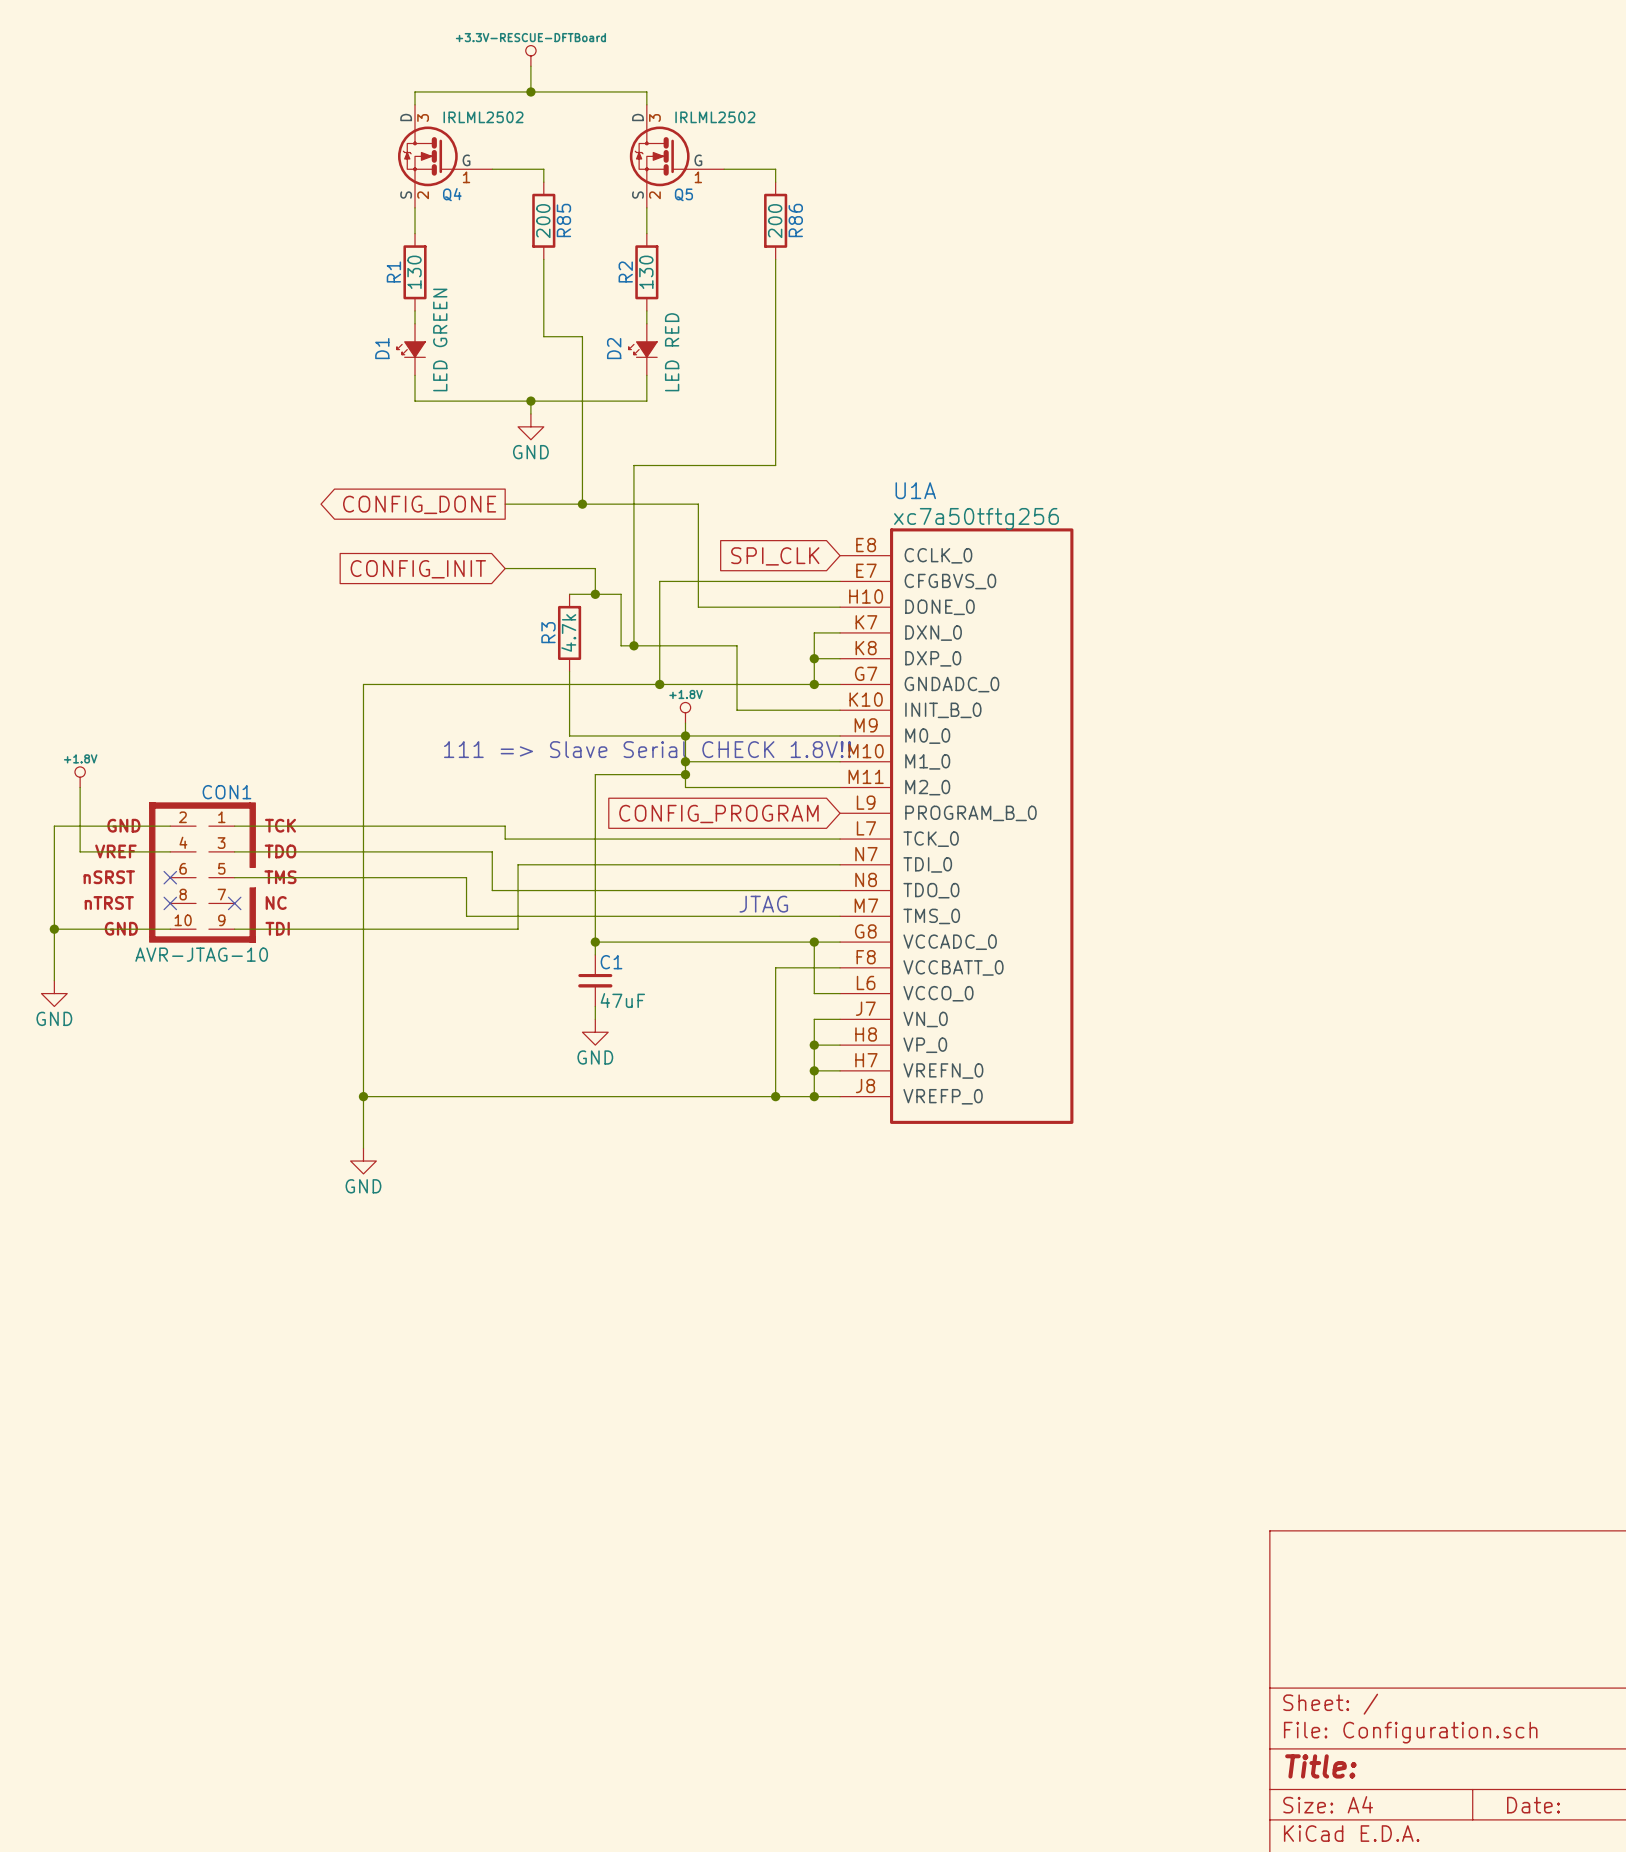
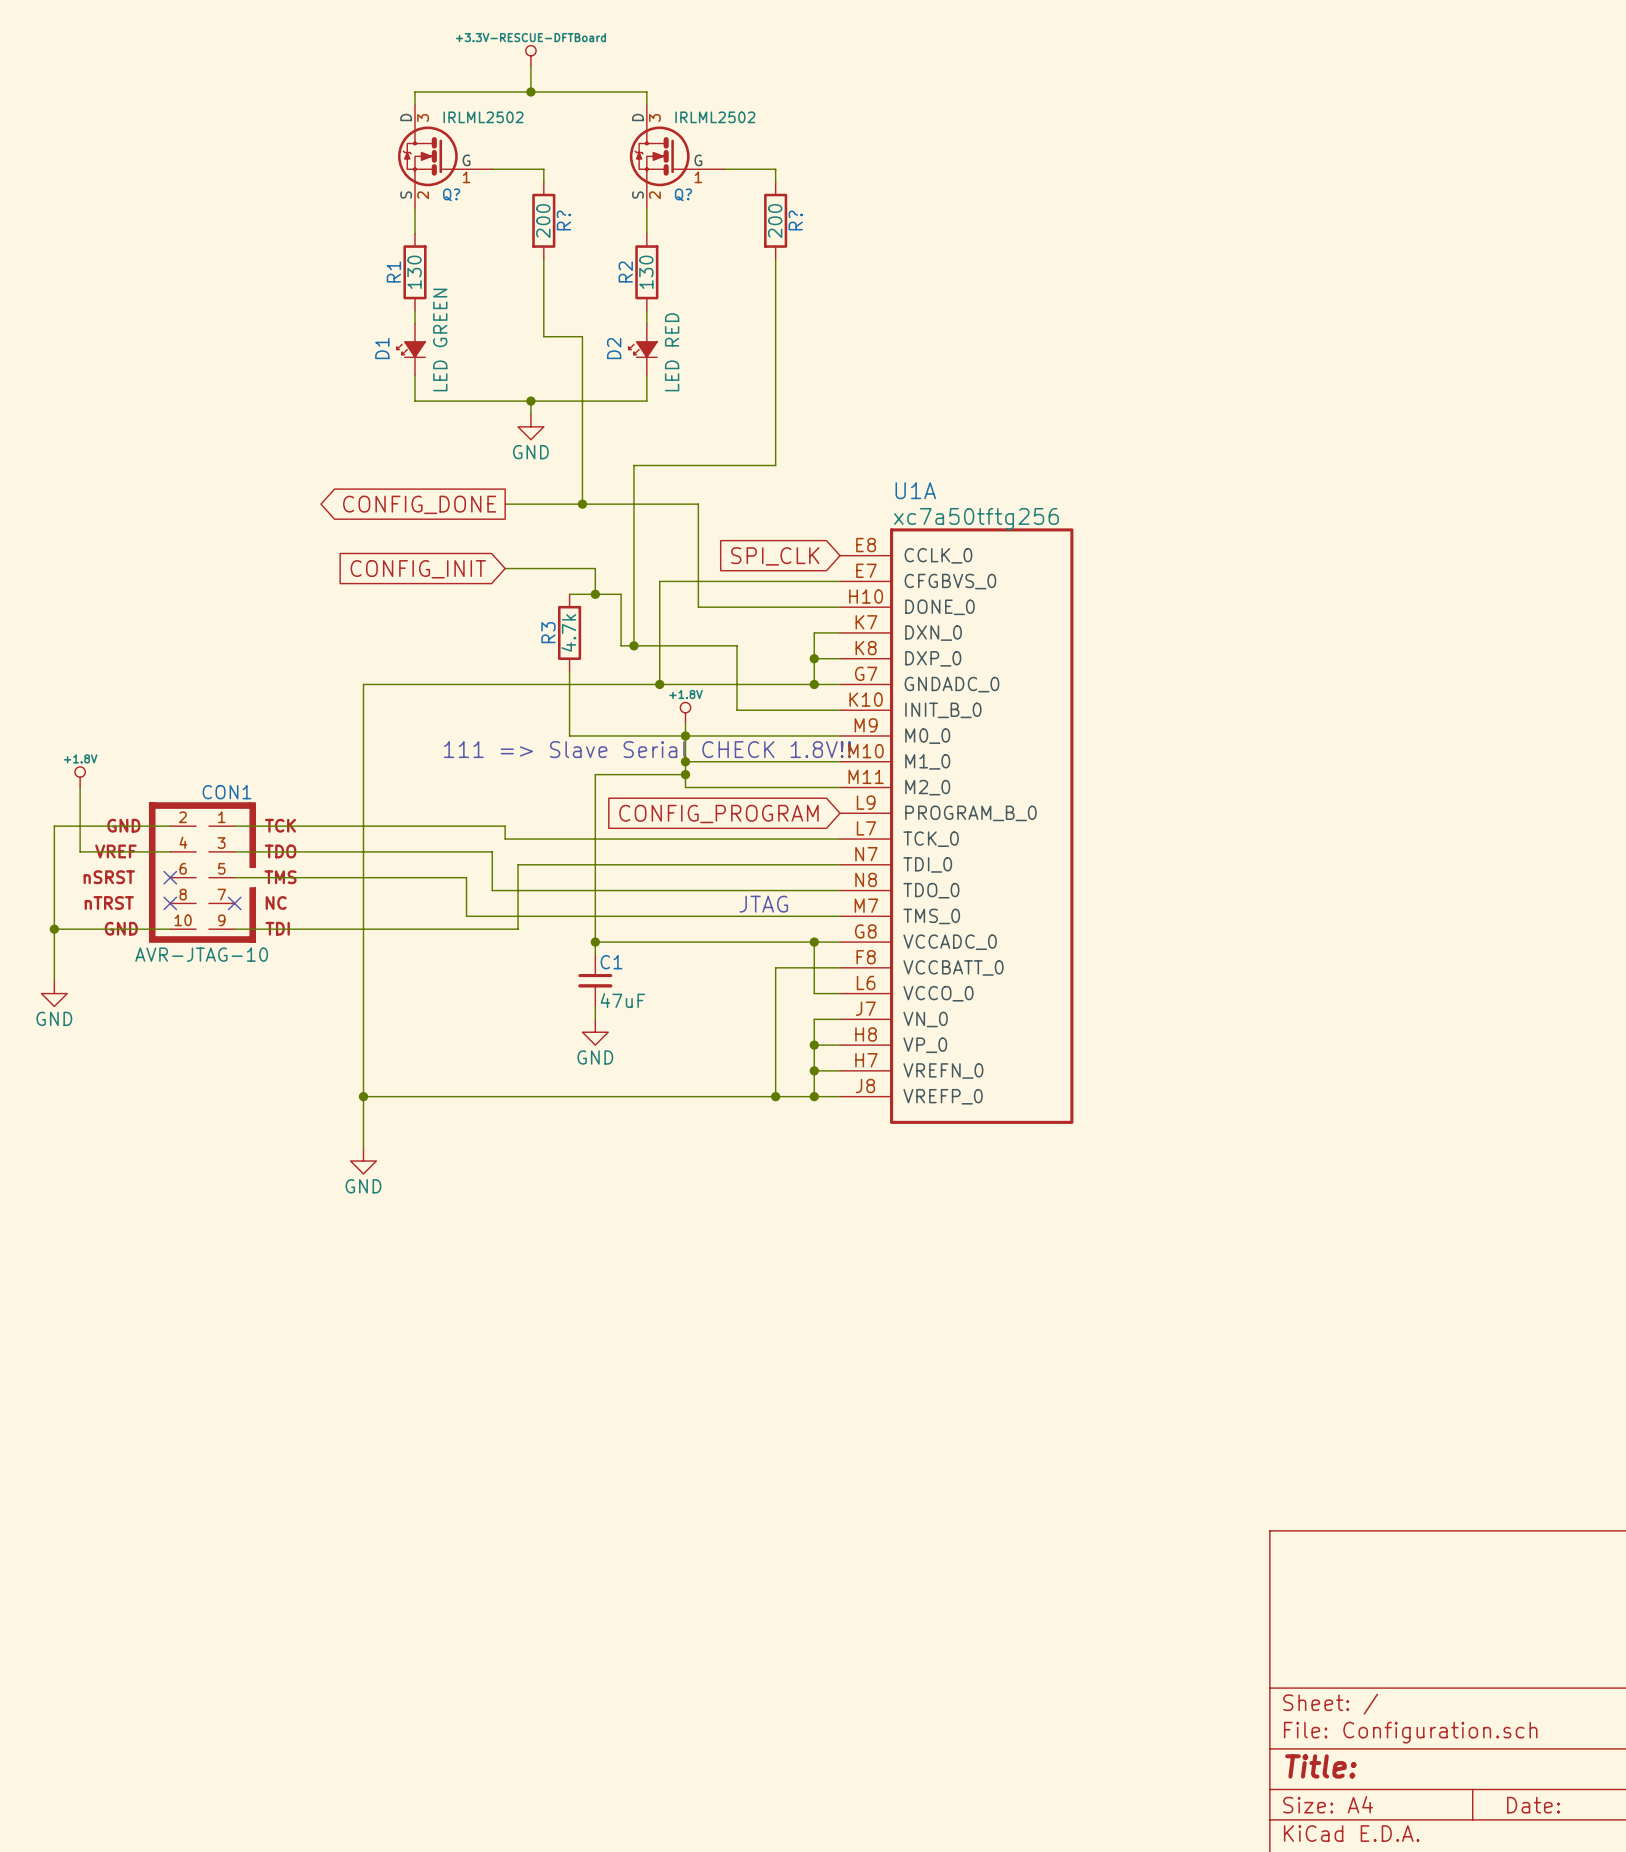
Q4 name: Q4 (452, 194) -> Q? (451, 194)
Q5 name: Q5 (683, 194) -> Q? (683, 194)
R85 name: R85 (563, 220) -> R? (563, 220)
R86 name: R86 (795, 220) -> R? (795, 220)

